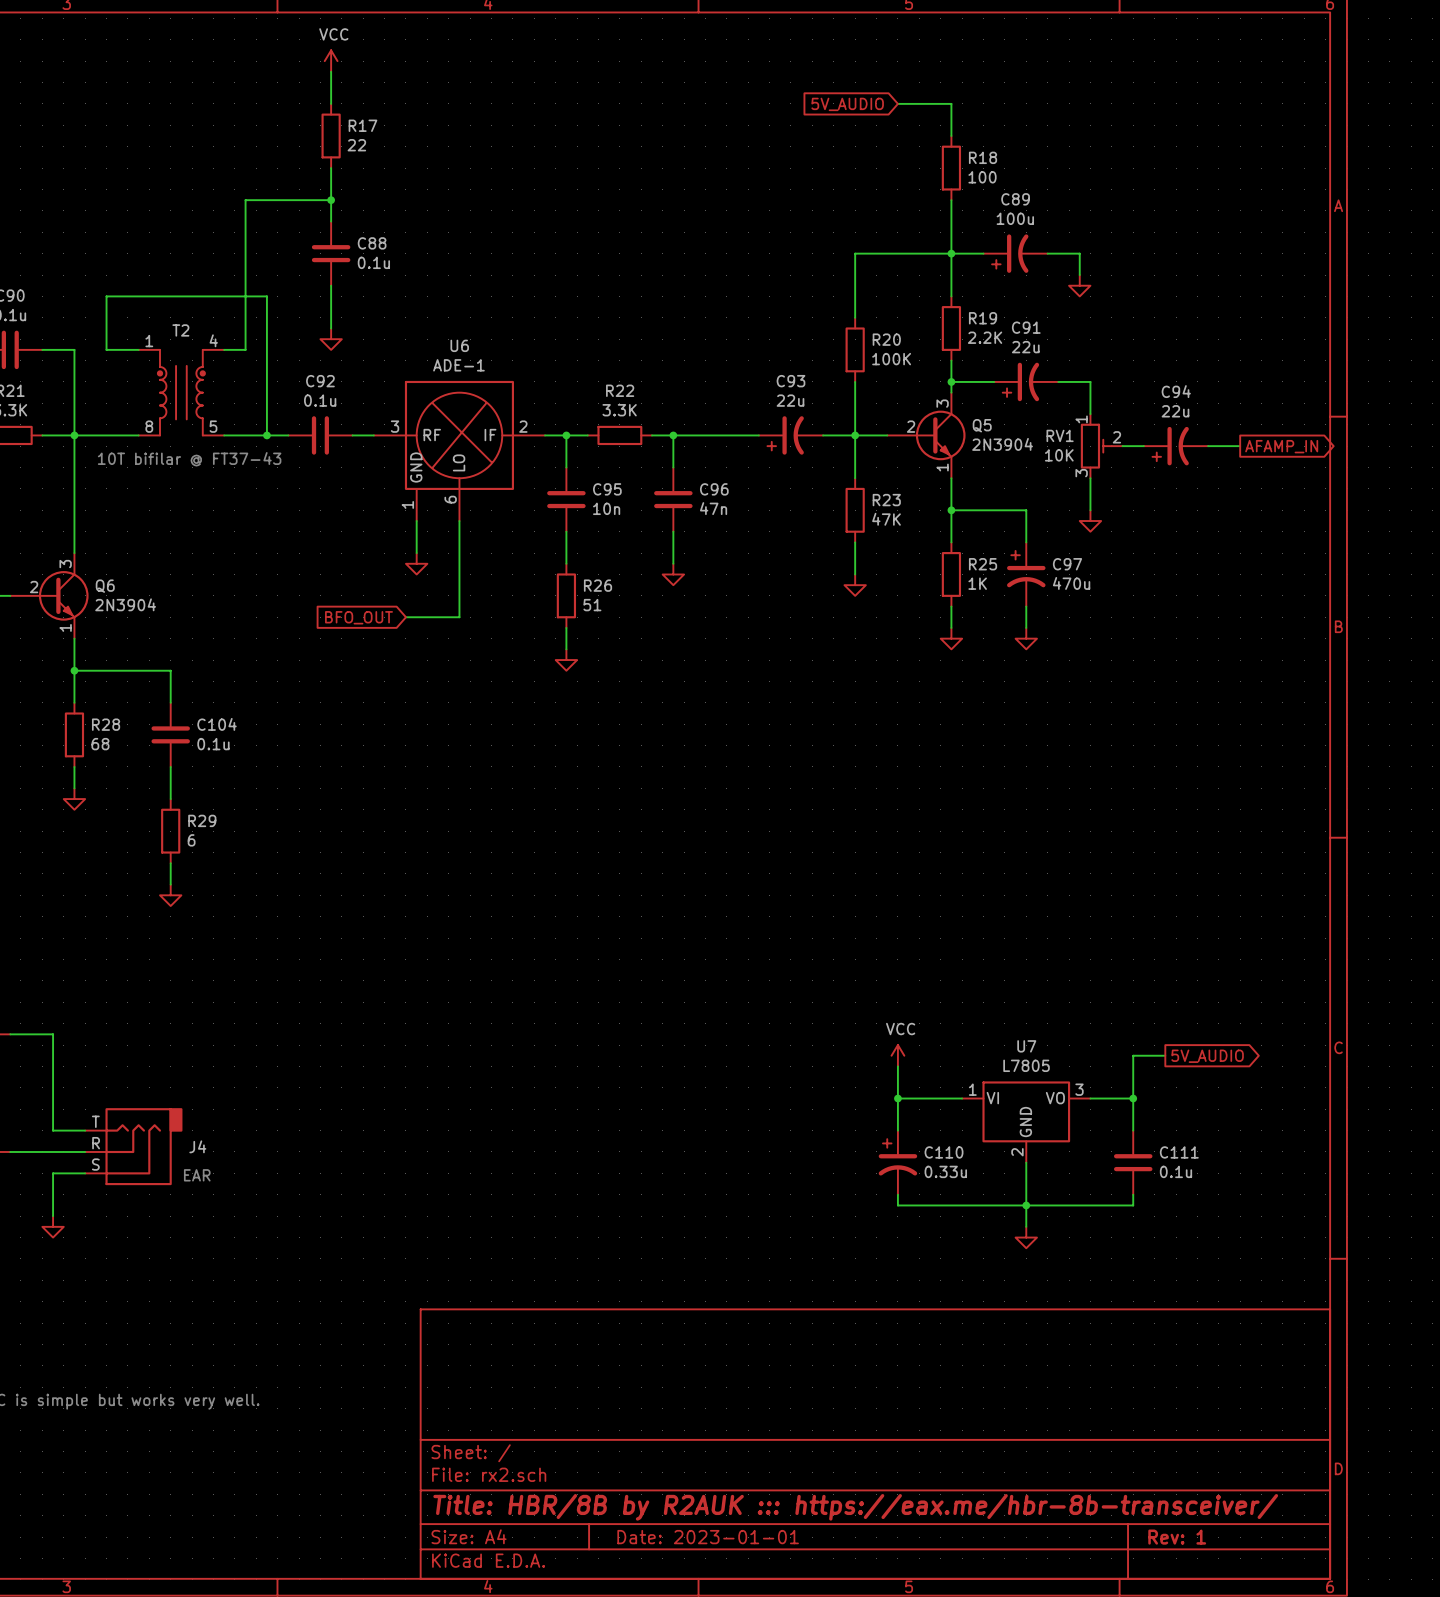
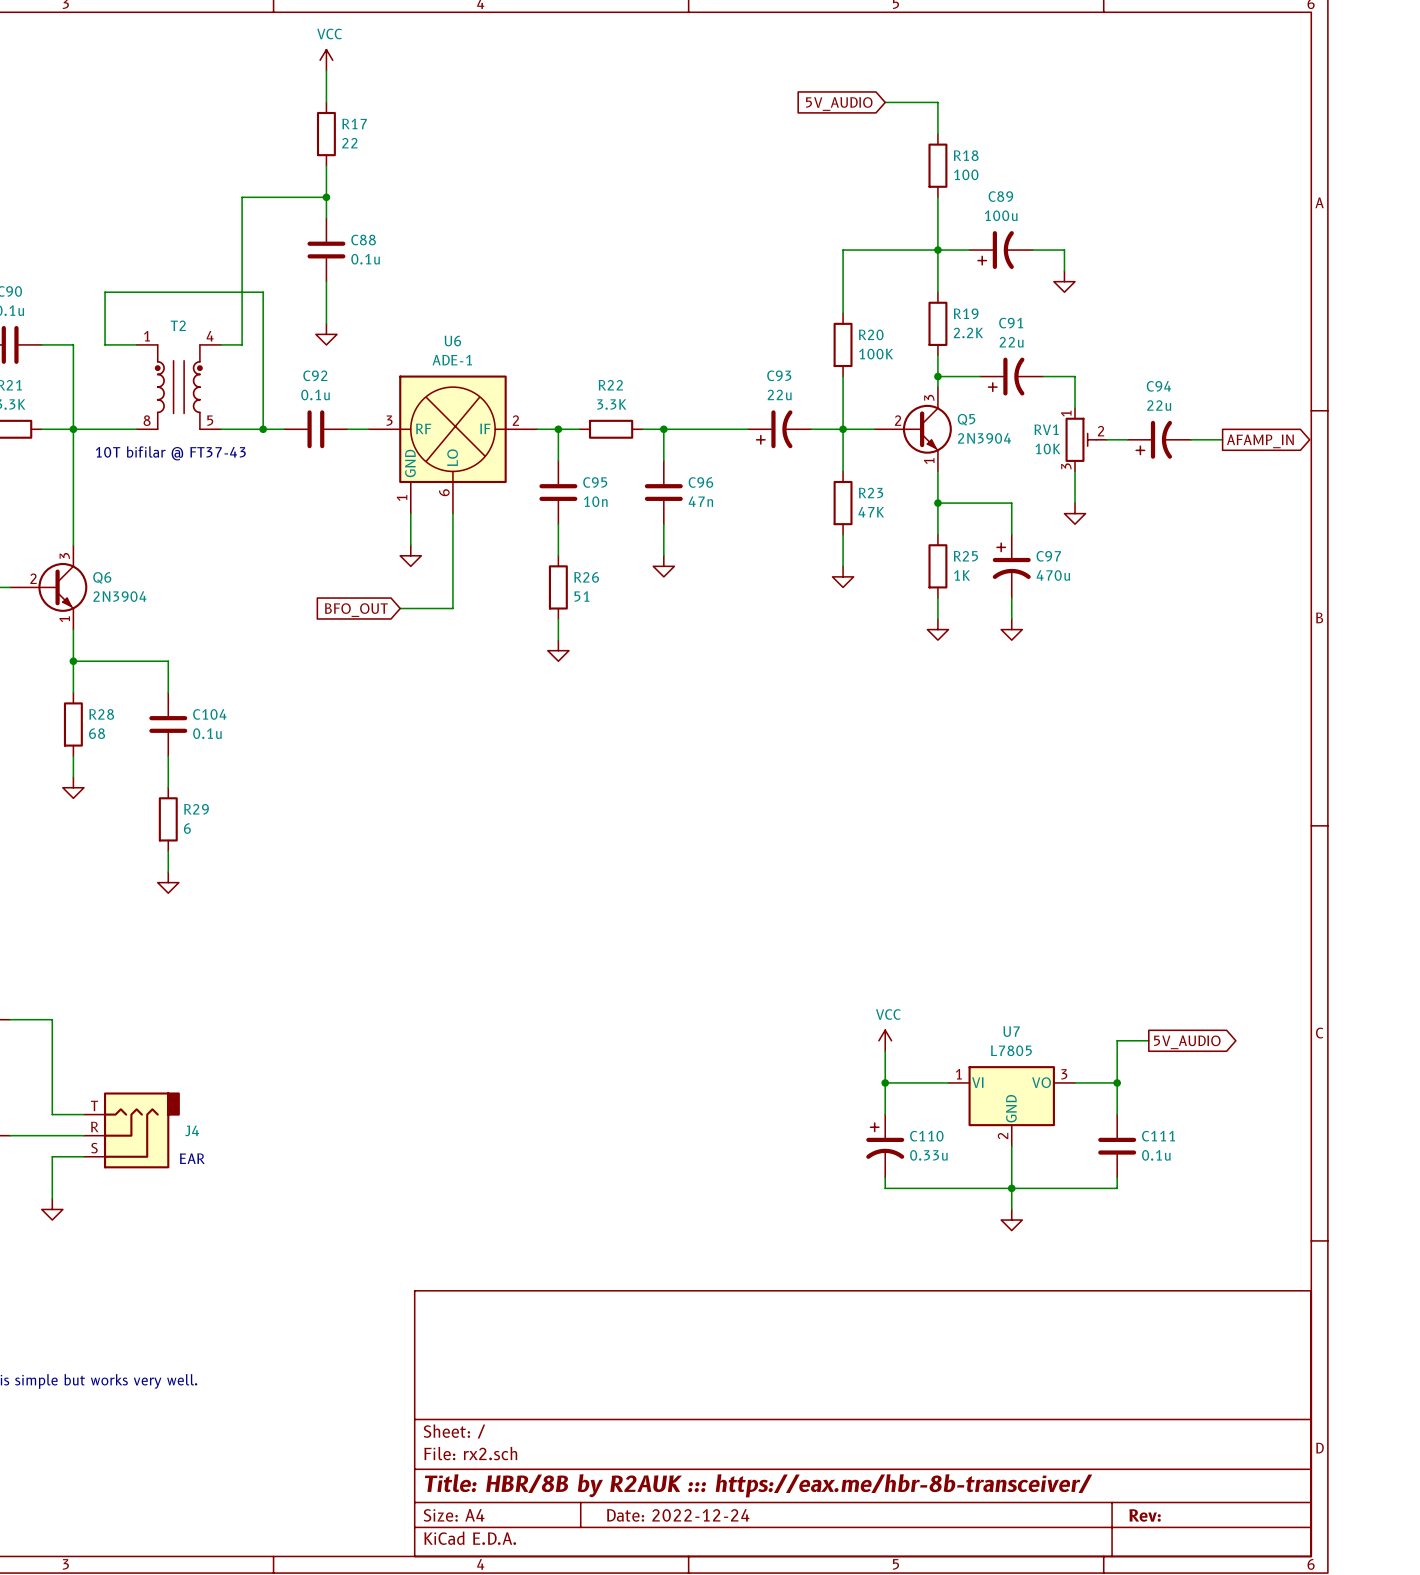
title block: Date: 2023-01-01 (708, 1537) -> Date: 2022-12-24 (678, 1515)
title block: Rev: 1 (1177, 1537) -> Rev: (1145, 1515)

